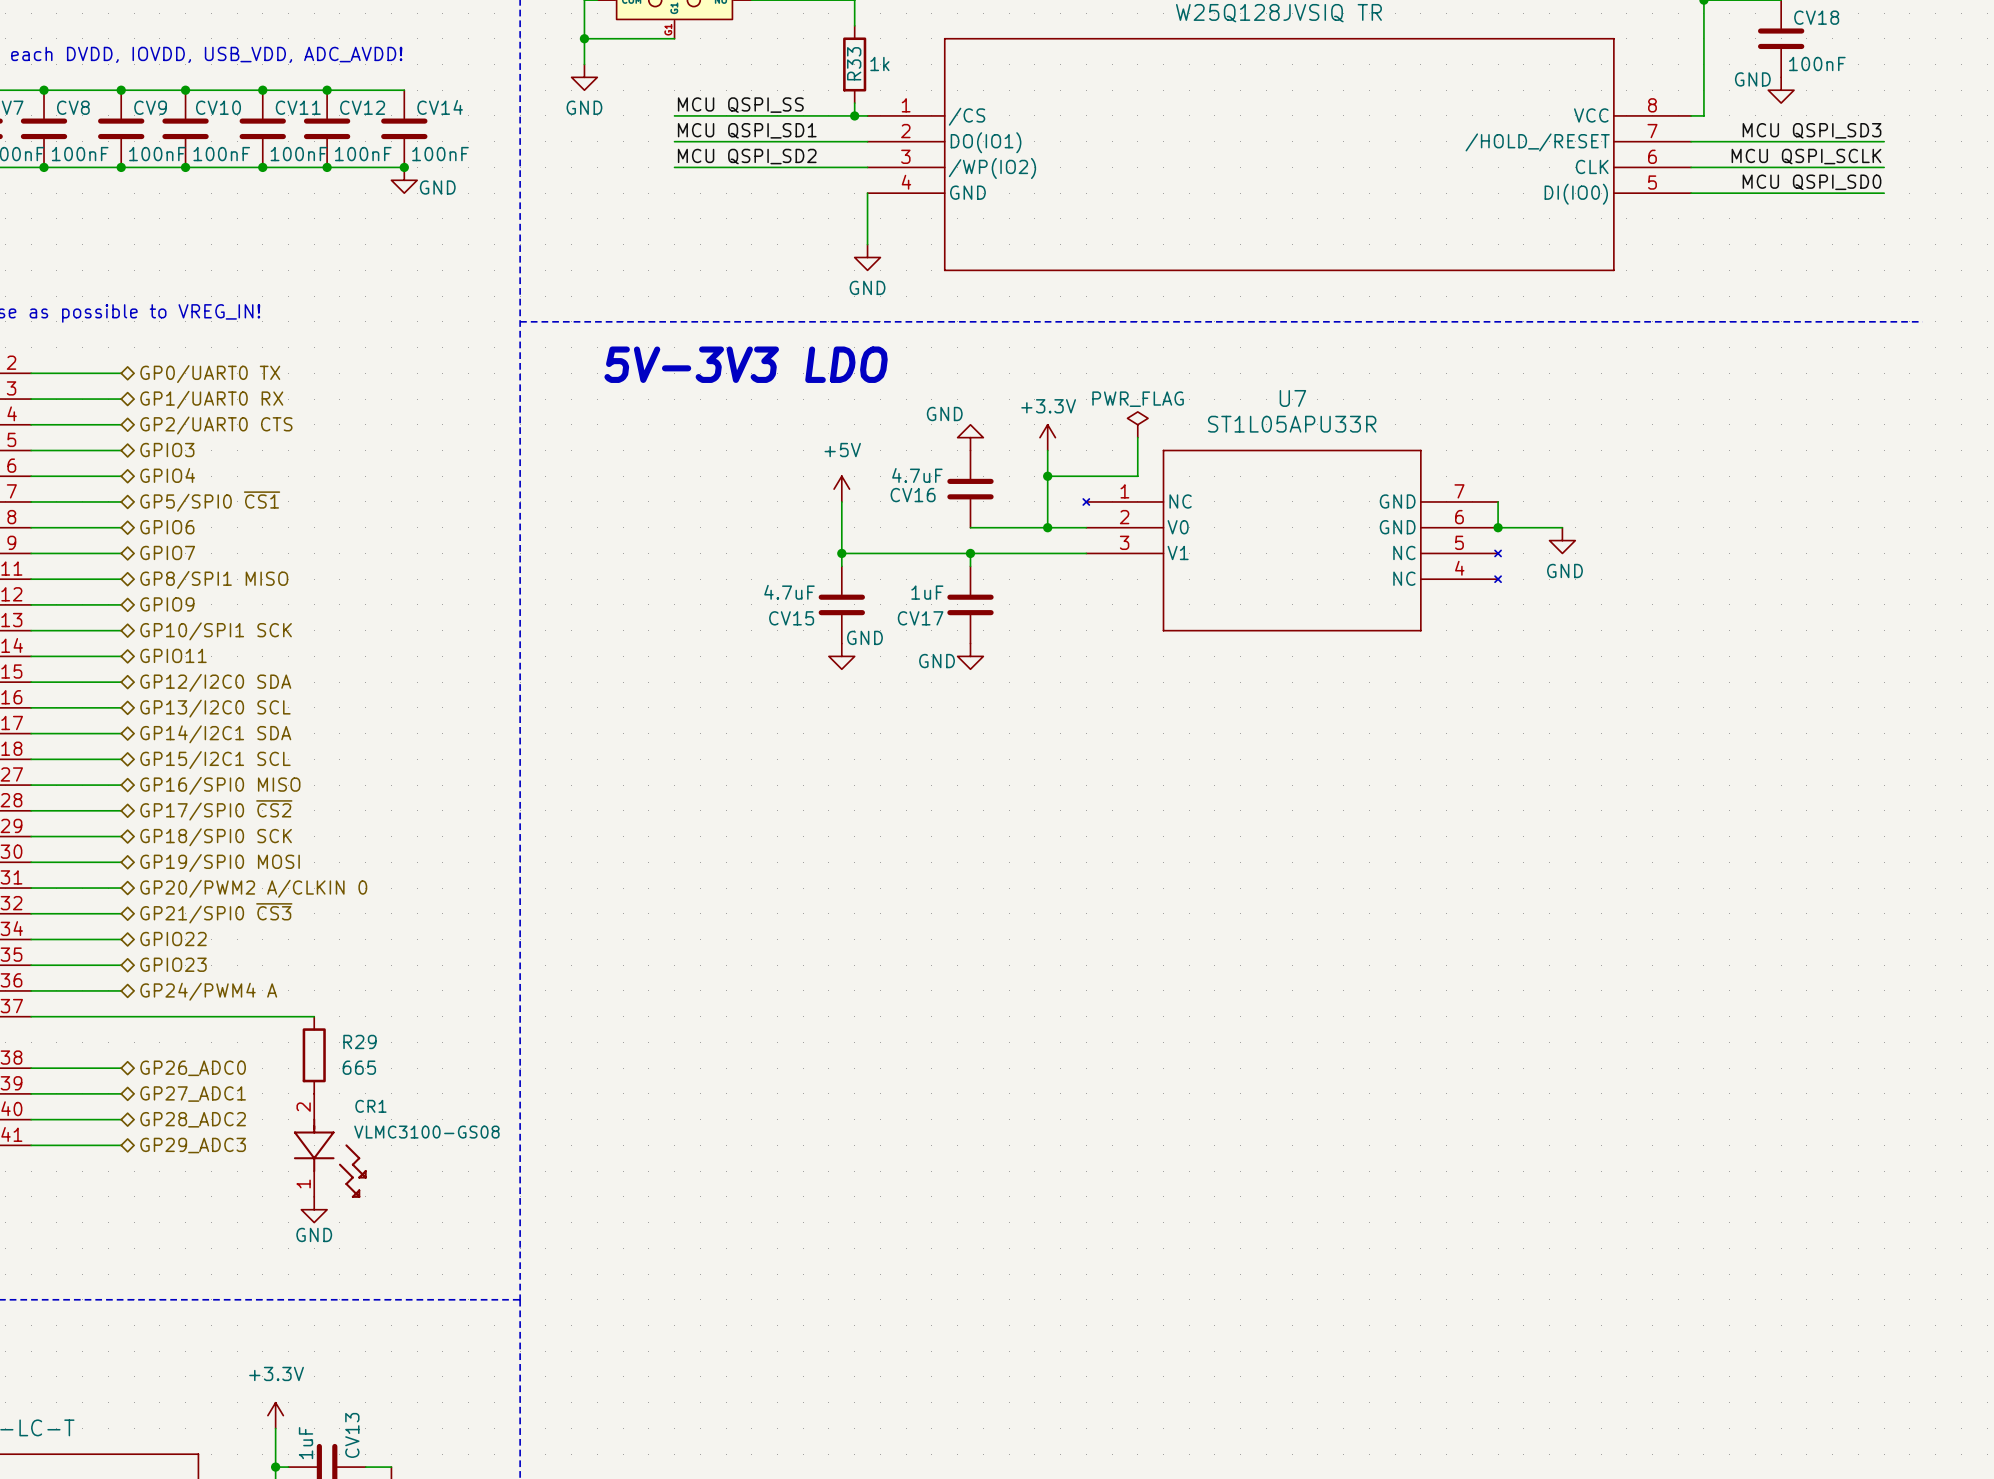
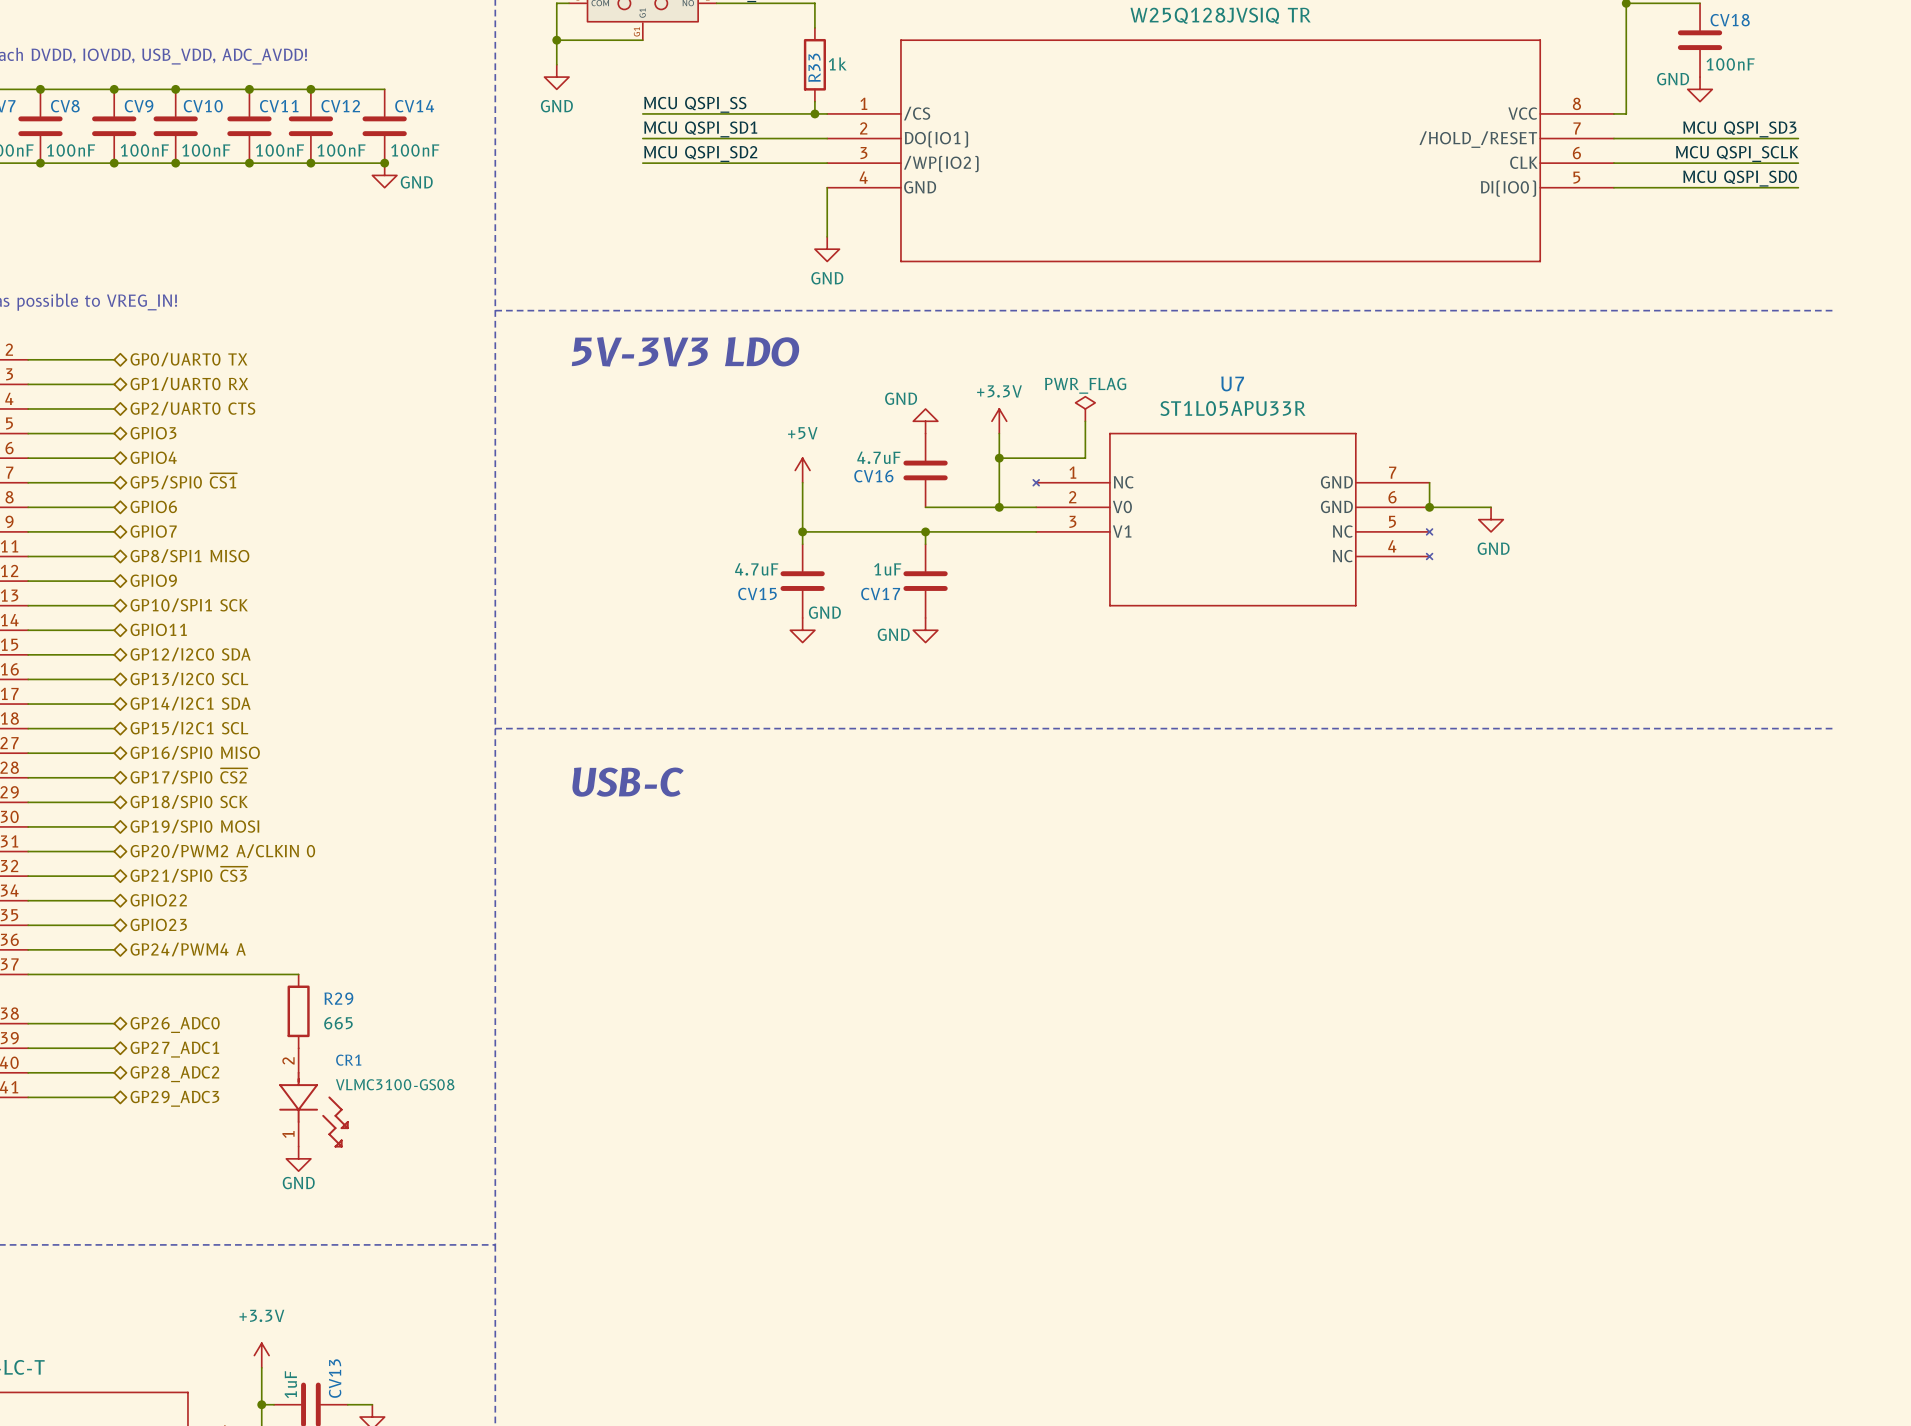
line: none -> (495, 728) (1835, 728)
text: none -> USB-C (627, 782)

